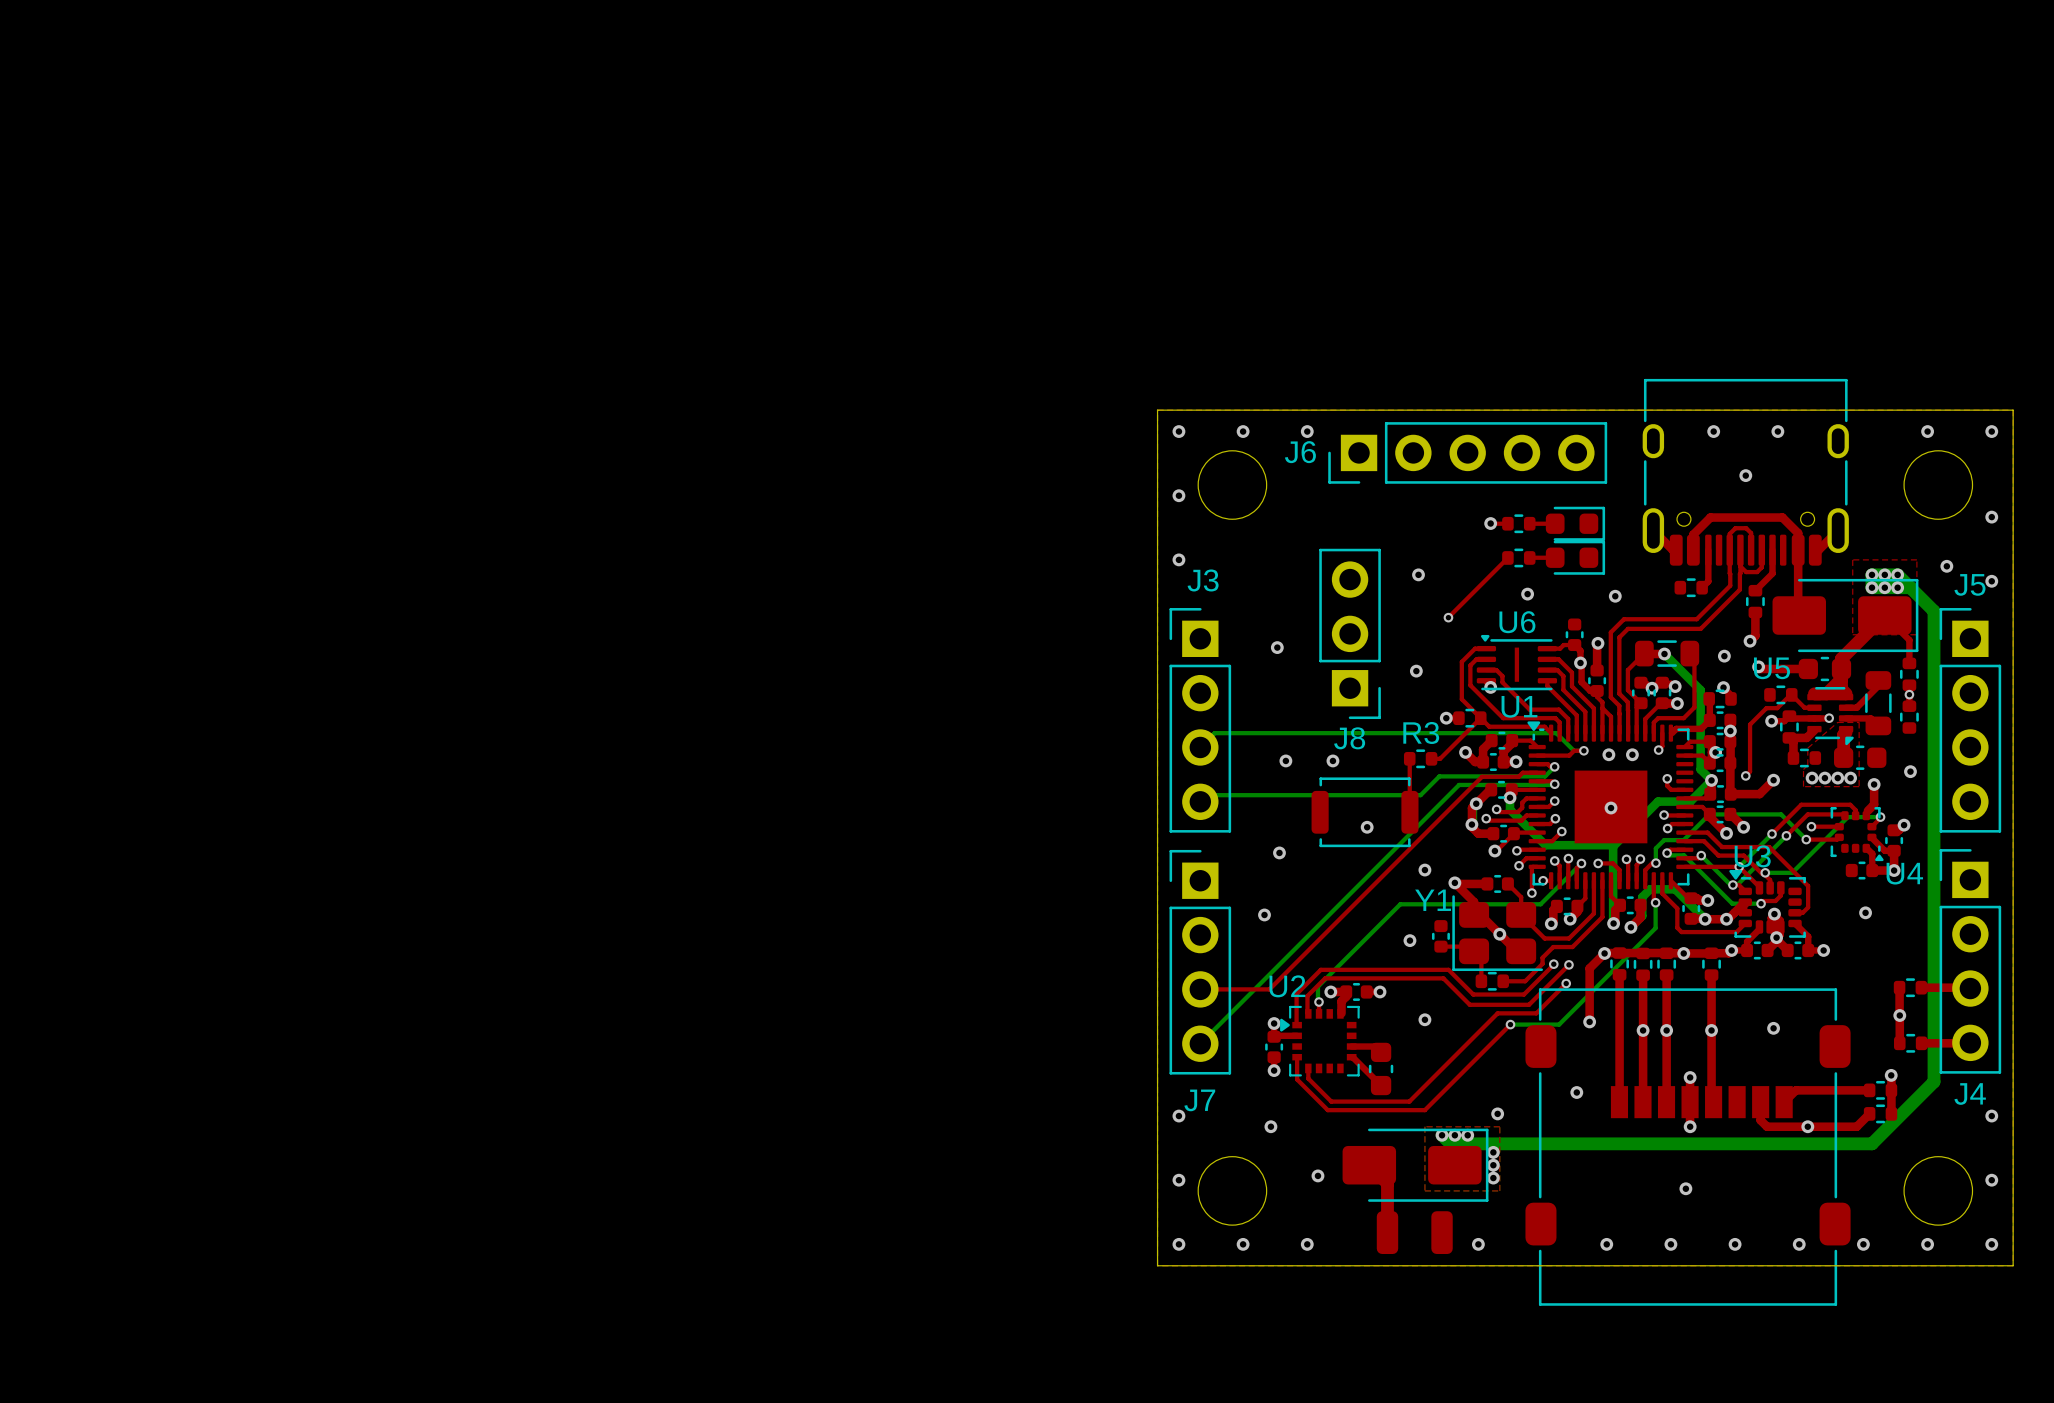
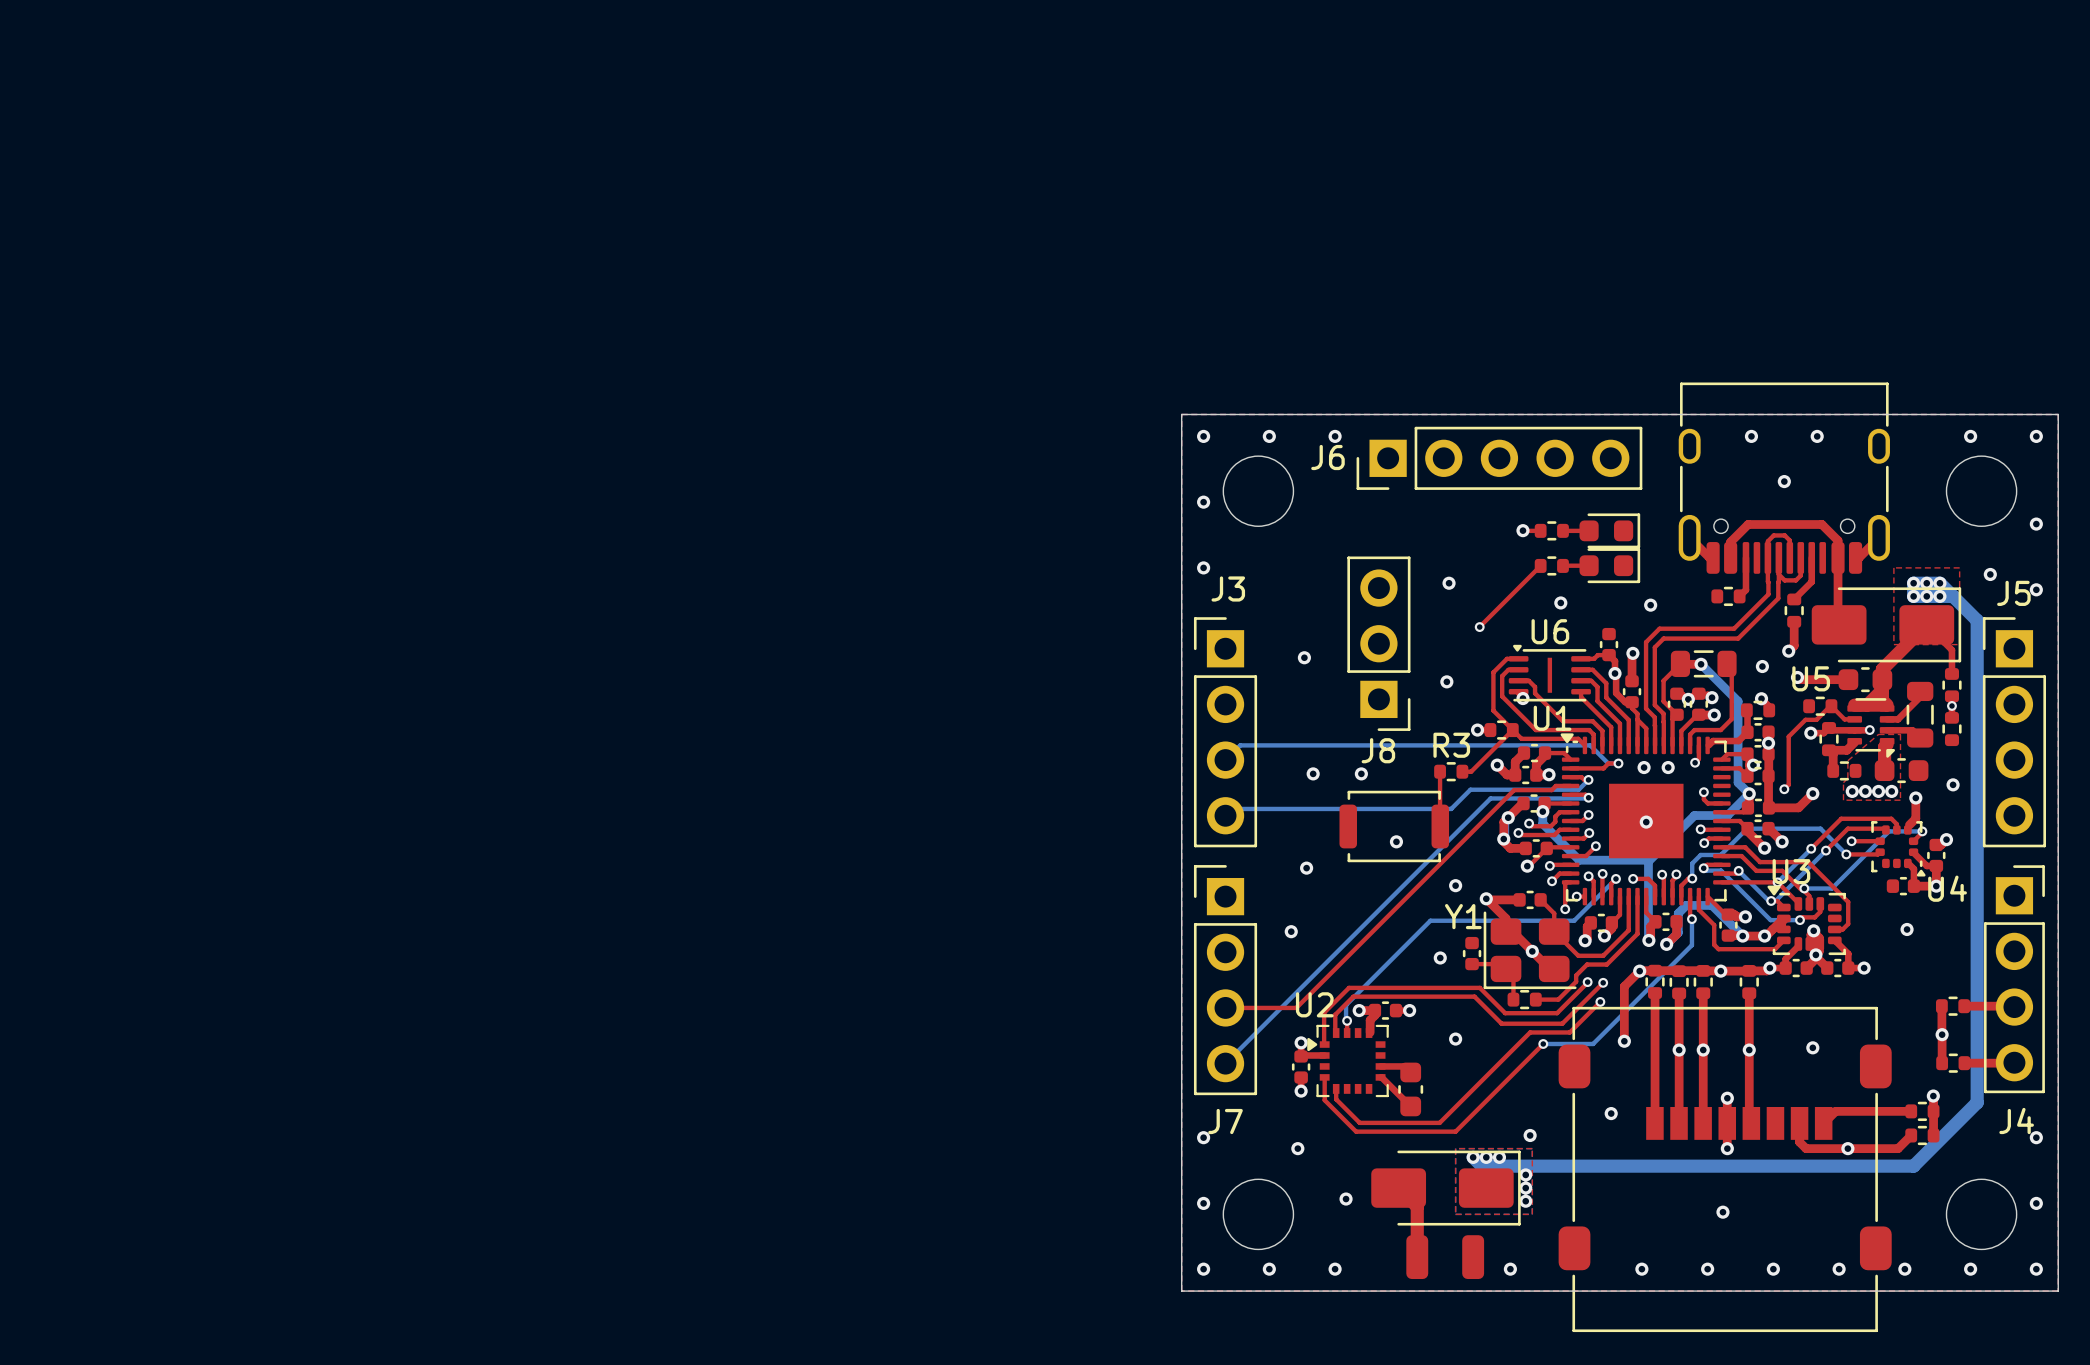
J4 footprint: [1939, 849, 2002, 1074] -> [1983, 865, 2045, 1094]

